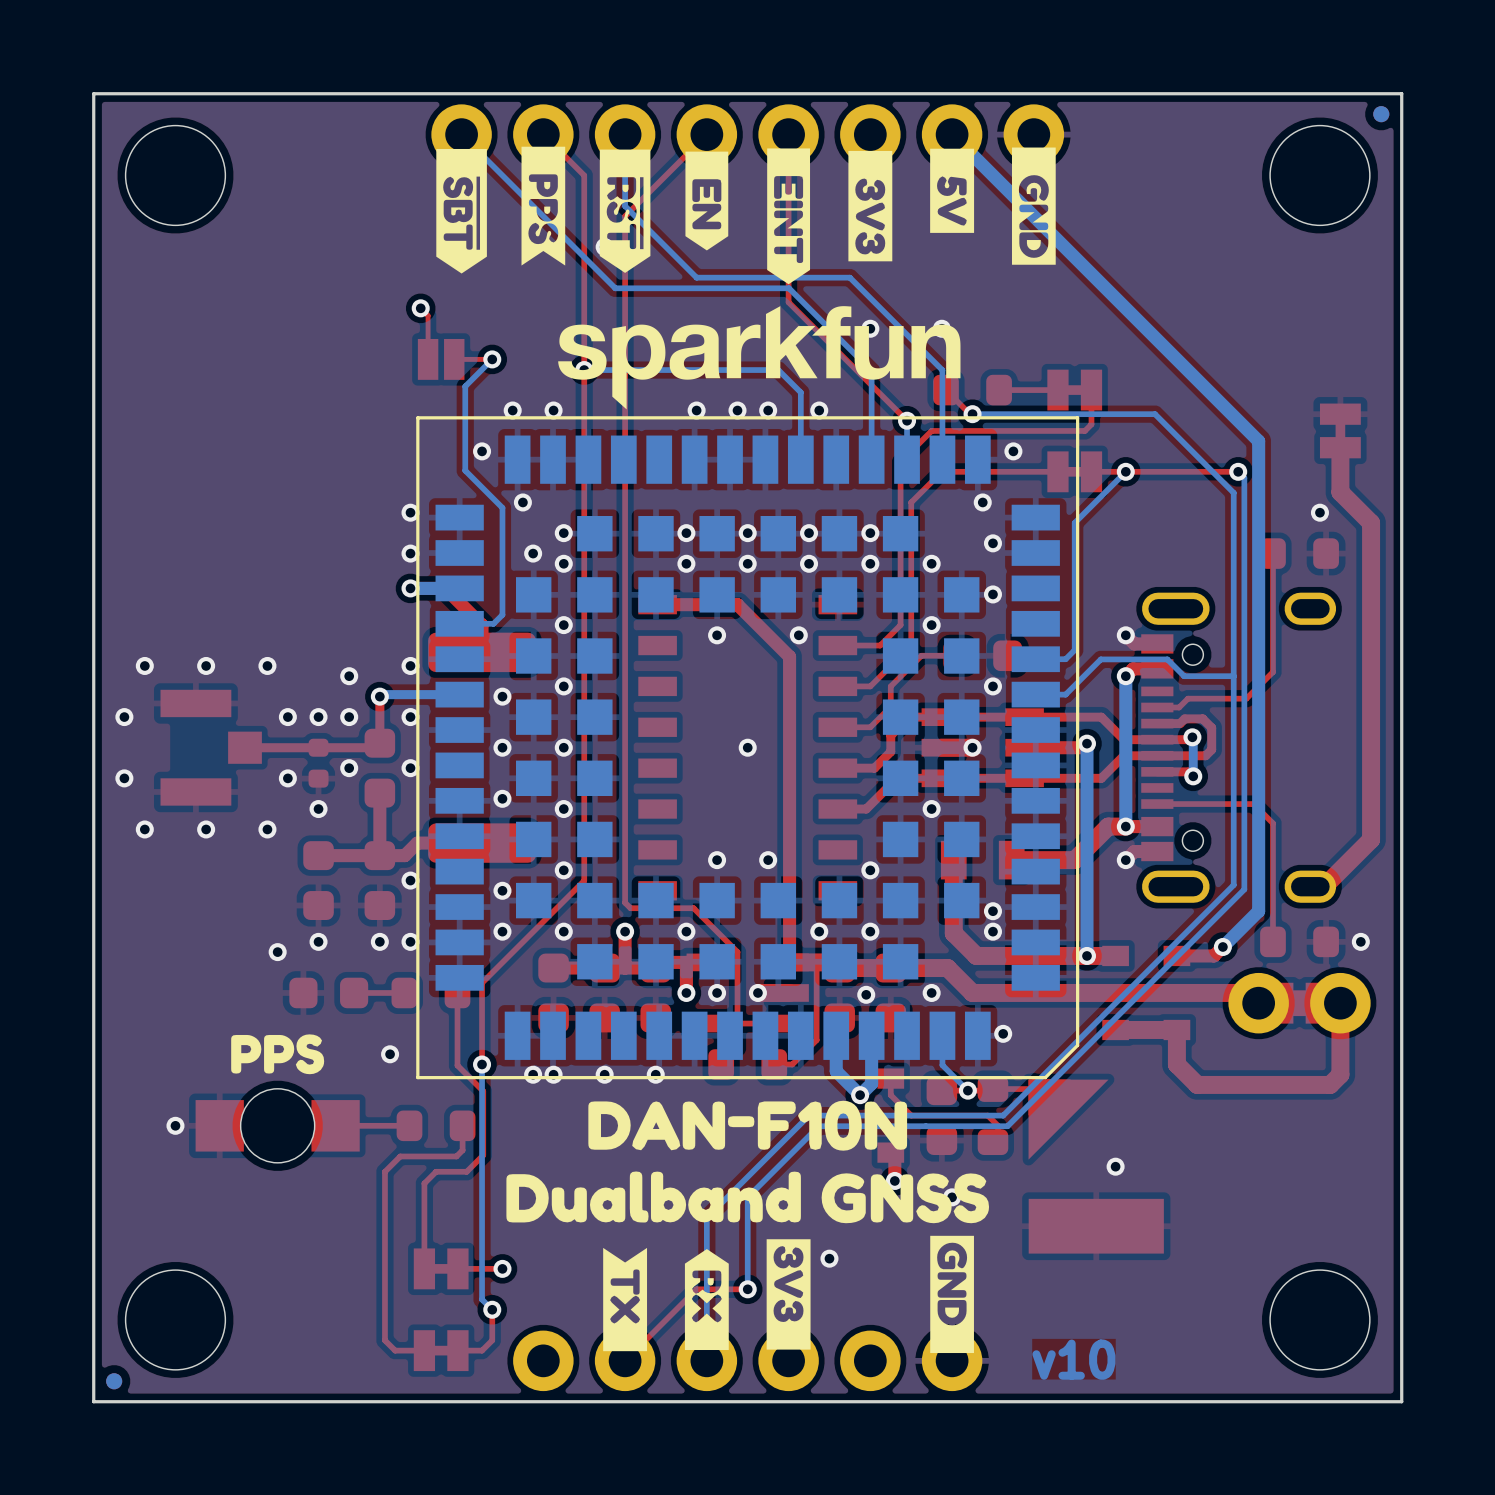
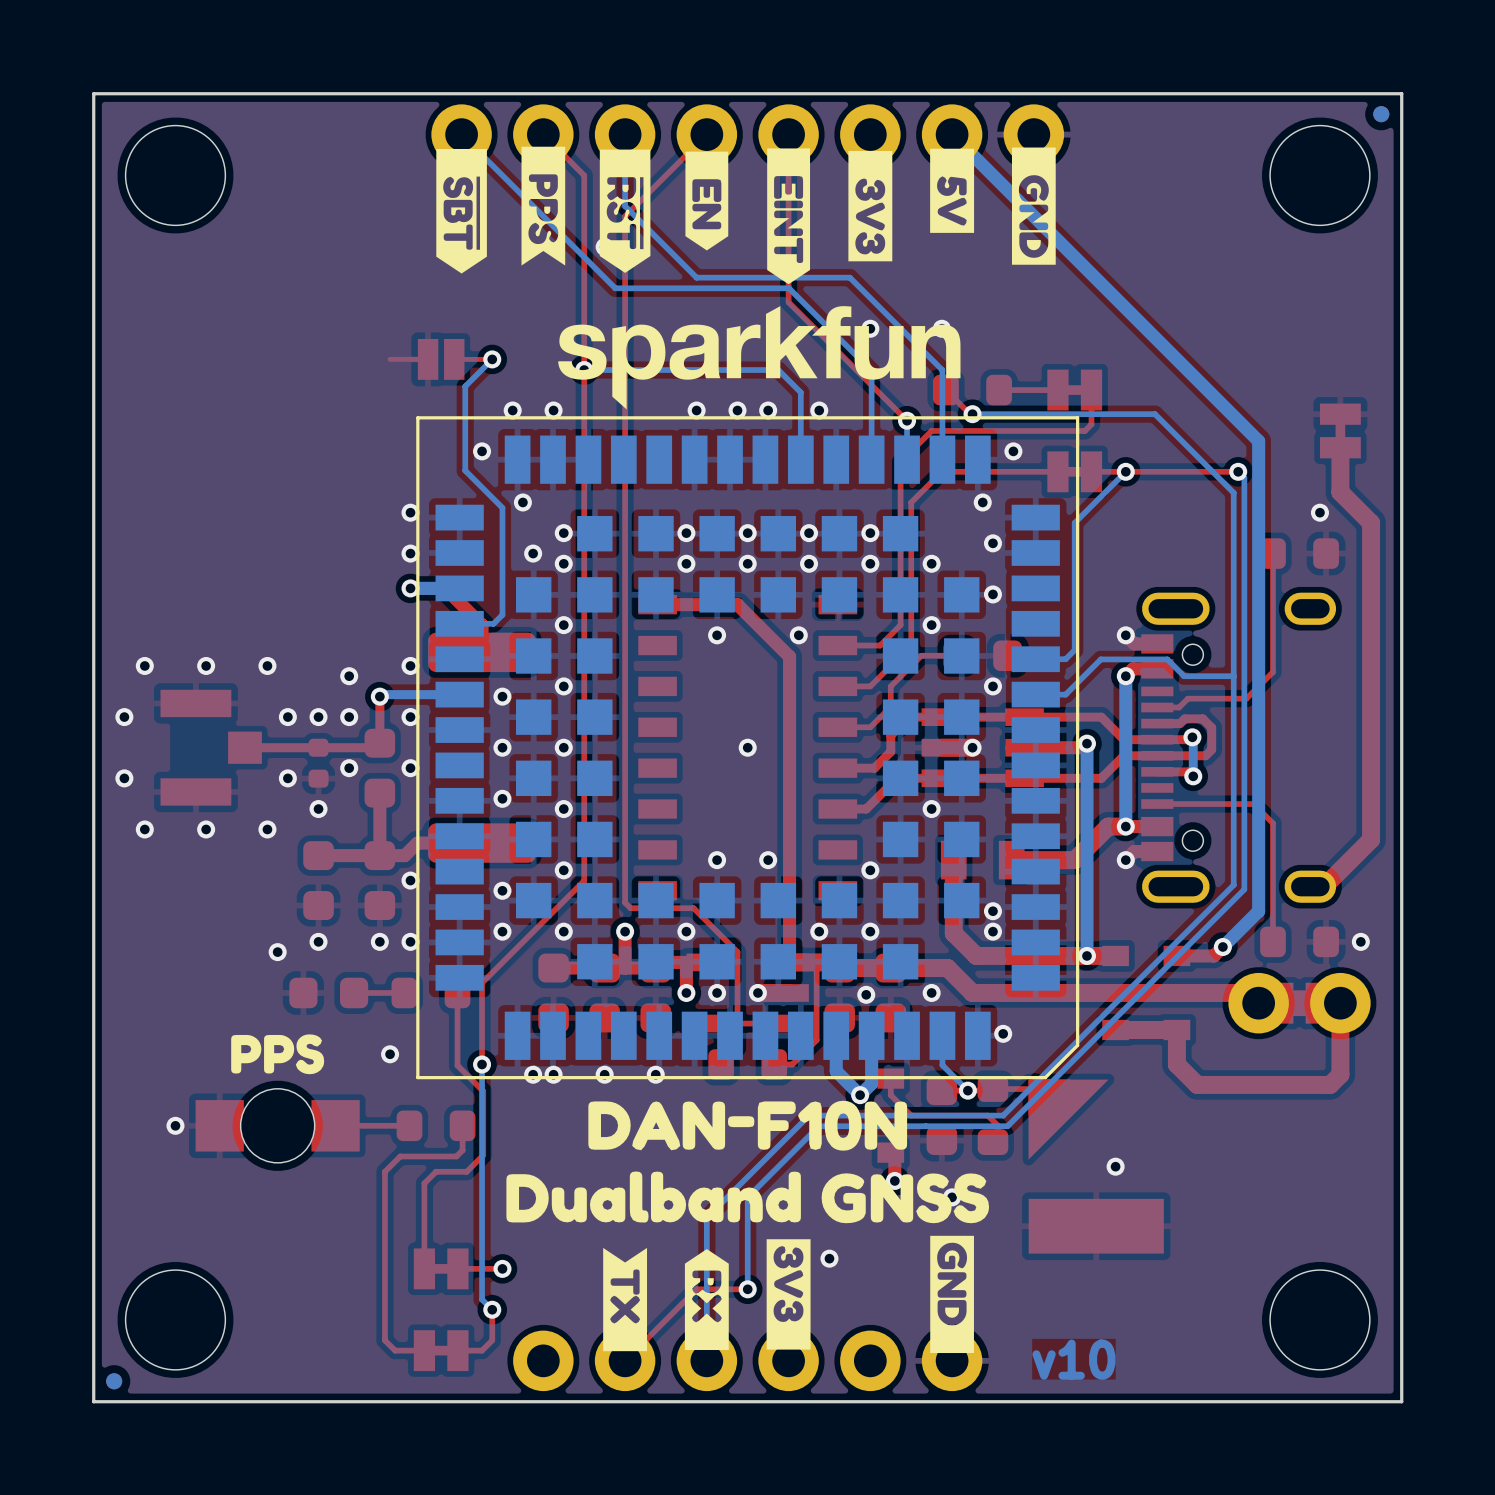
top track: (420, 308) (428, 315) (428, 359) -> (390, 359) (428, 359)
via: (420, 308) -> none

